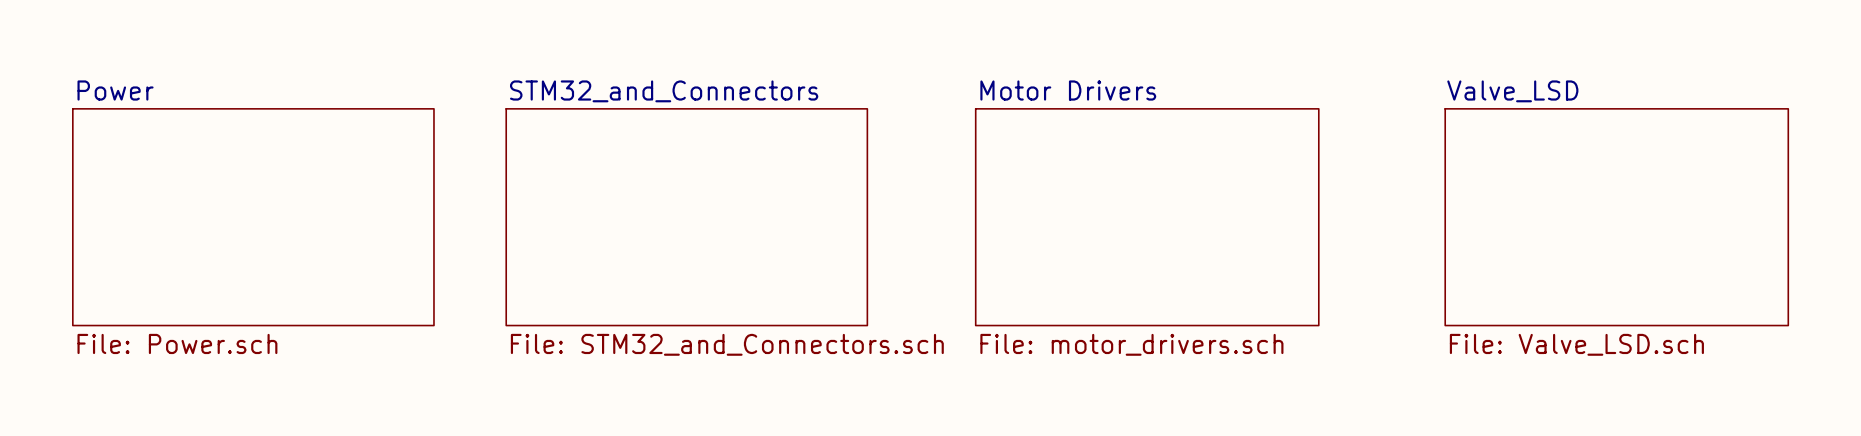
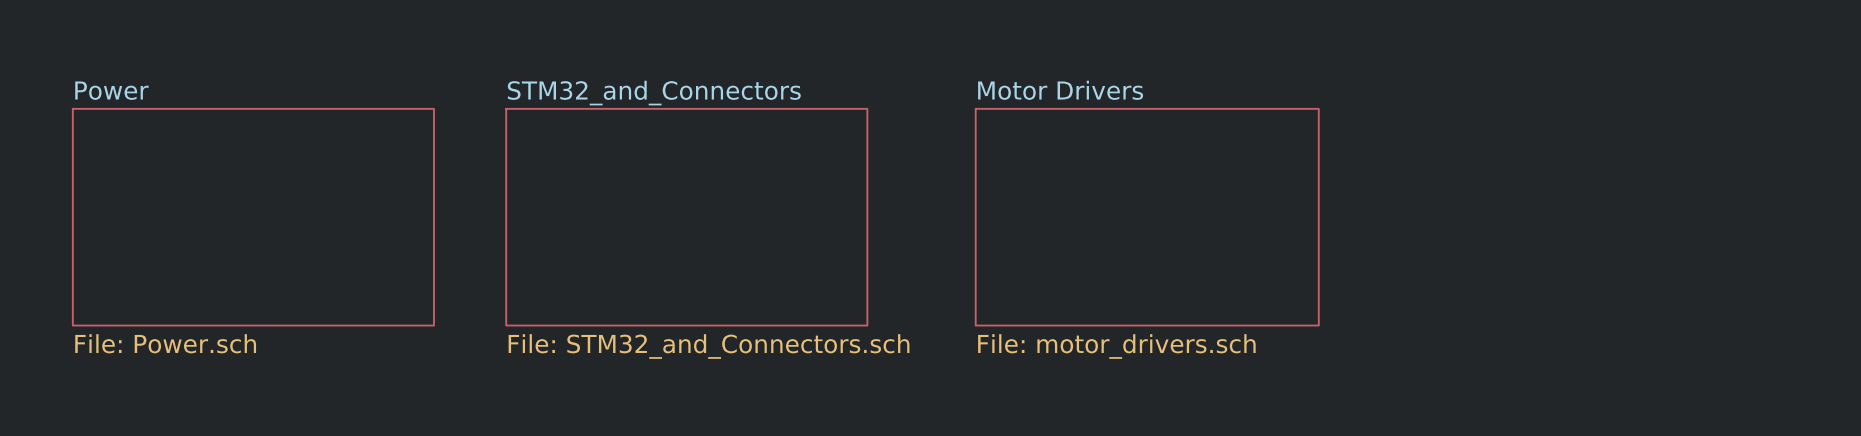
sheet Valve_LSD: File: Valve_LSD.sch (1616, 217) -> none

